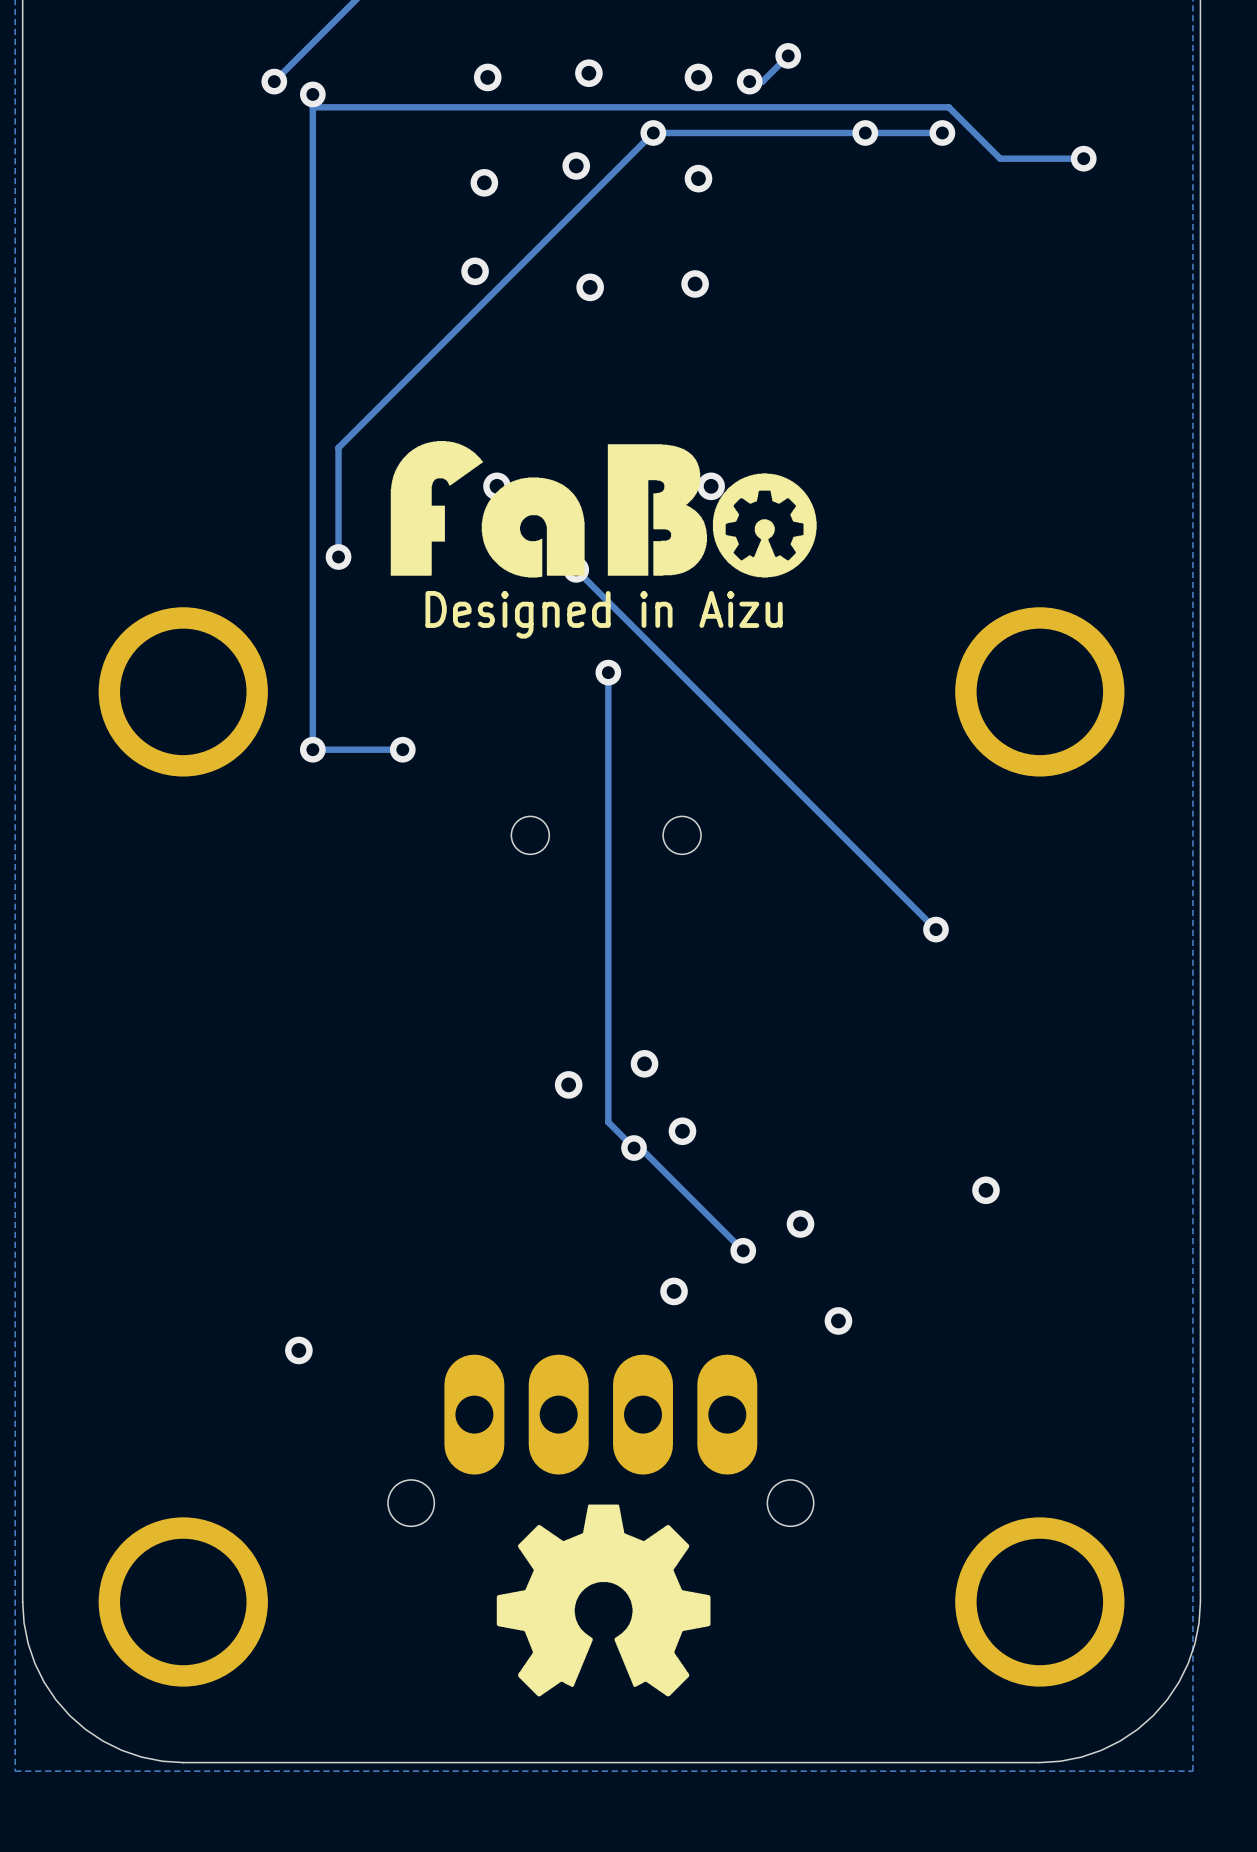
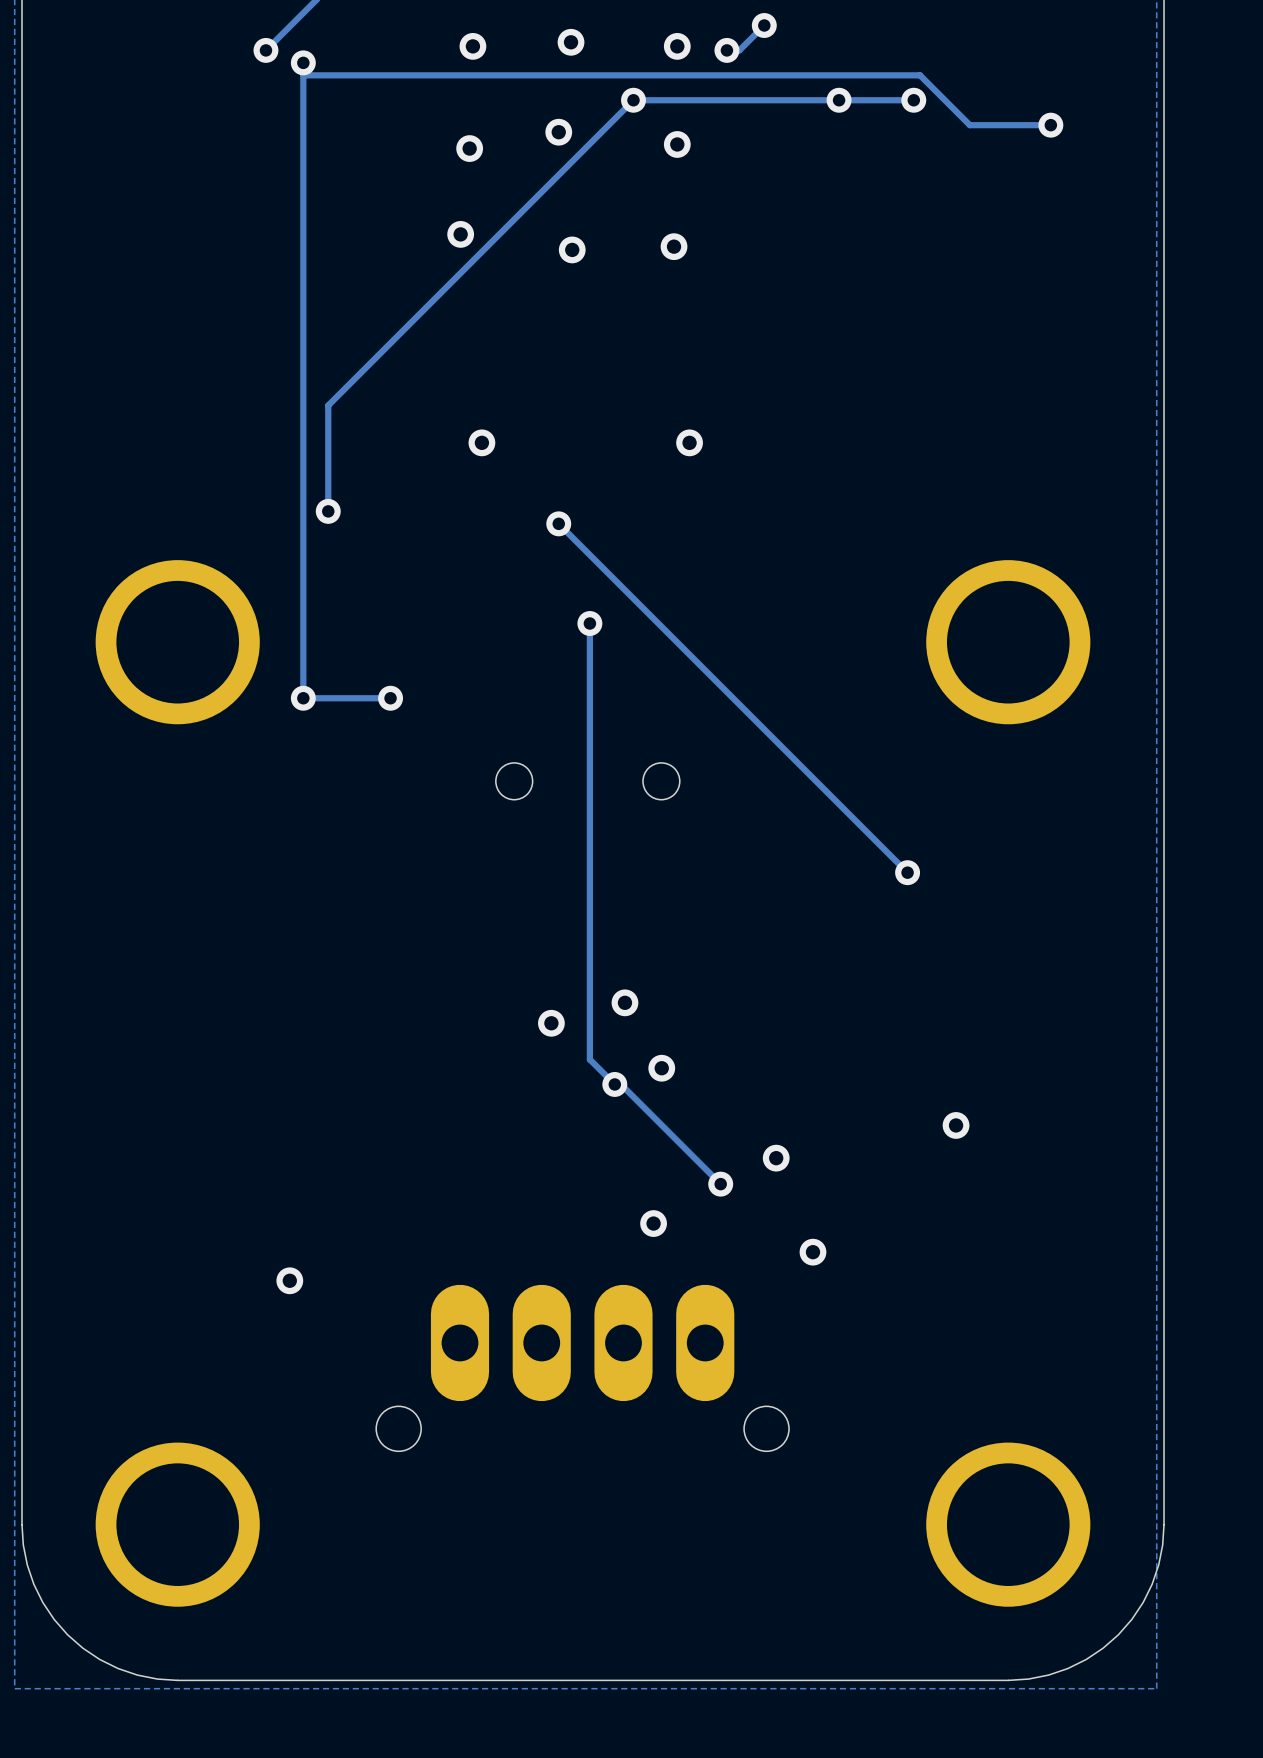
drawing: [390, 441, 817, 578] -> none
text: Designed in Aizu (604, 614) -> none
drawing: [496, 1504, 711, 1697] -> none

